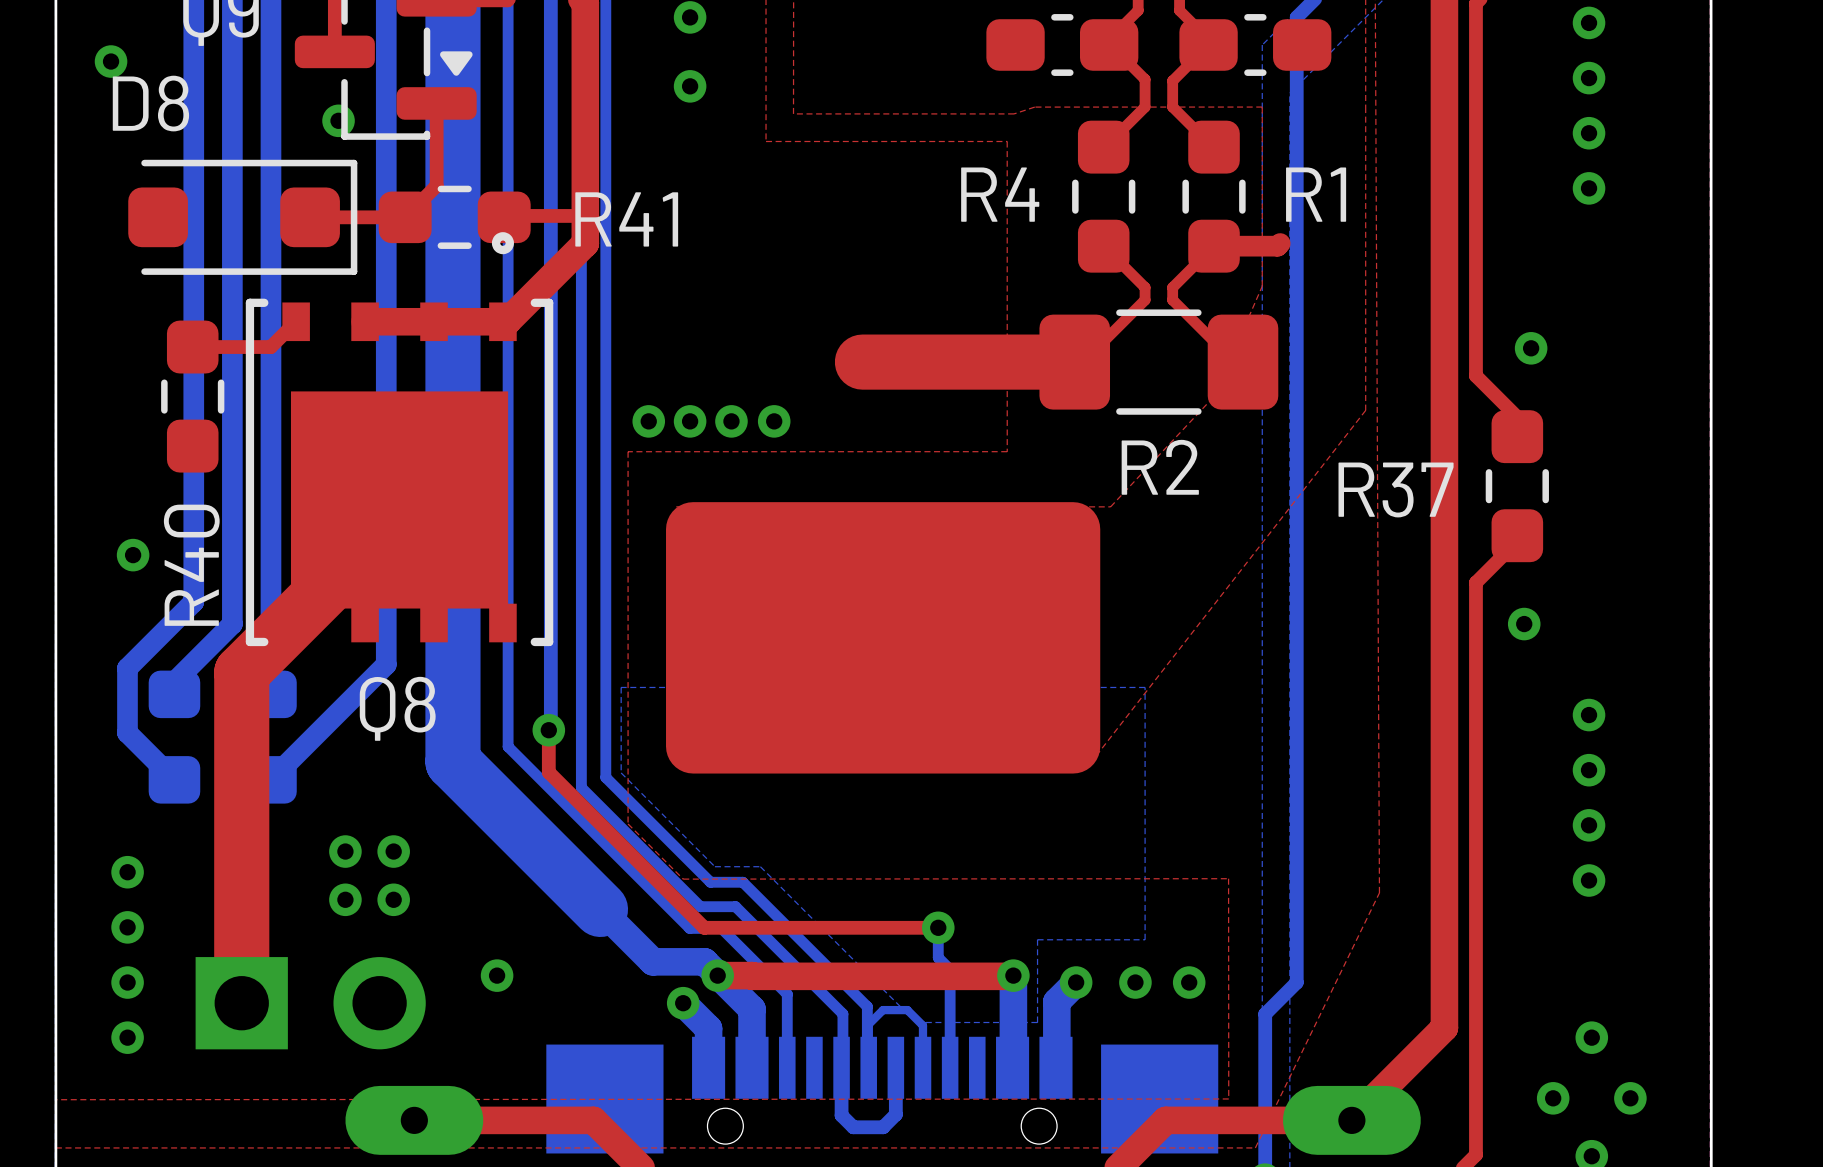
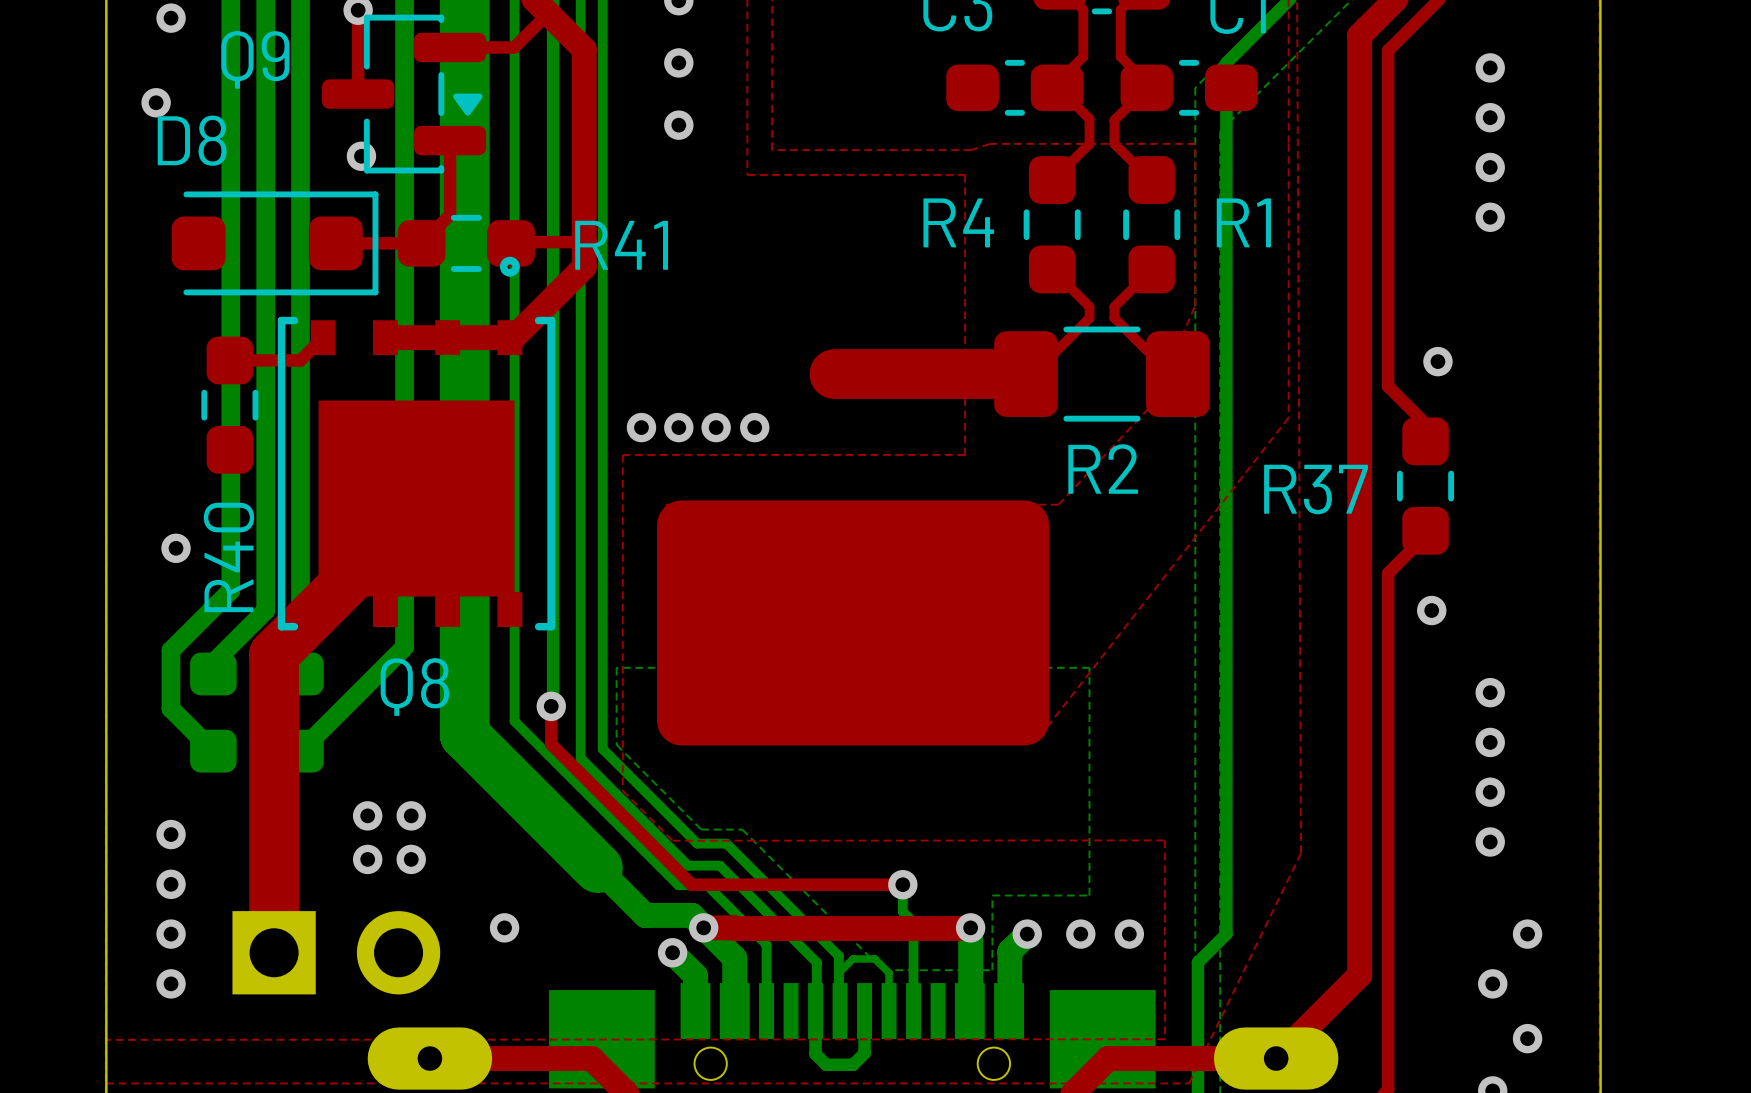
top track: (1280, 243) (1277, 246) (1214, 246) -> none
via position: (1553, 1098) -> (1527, 934)

